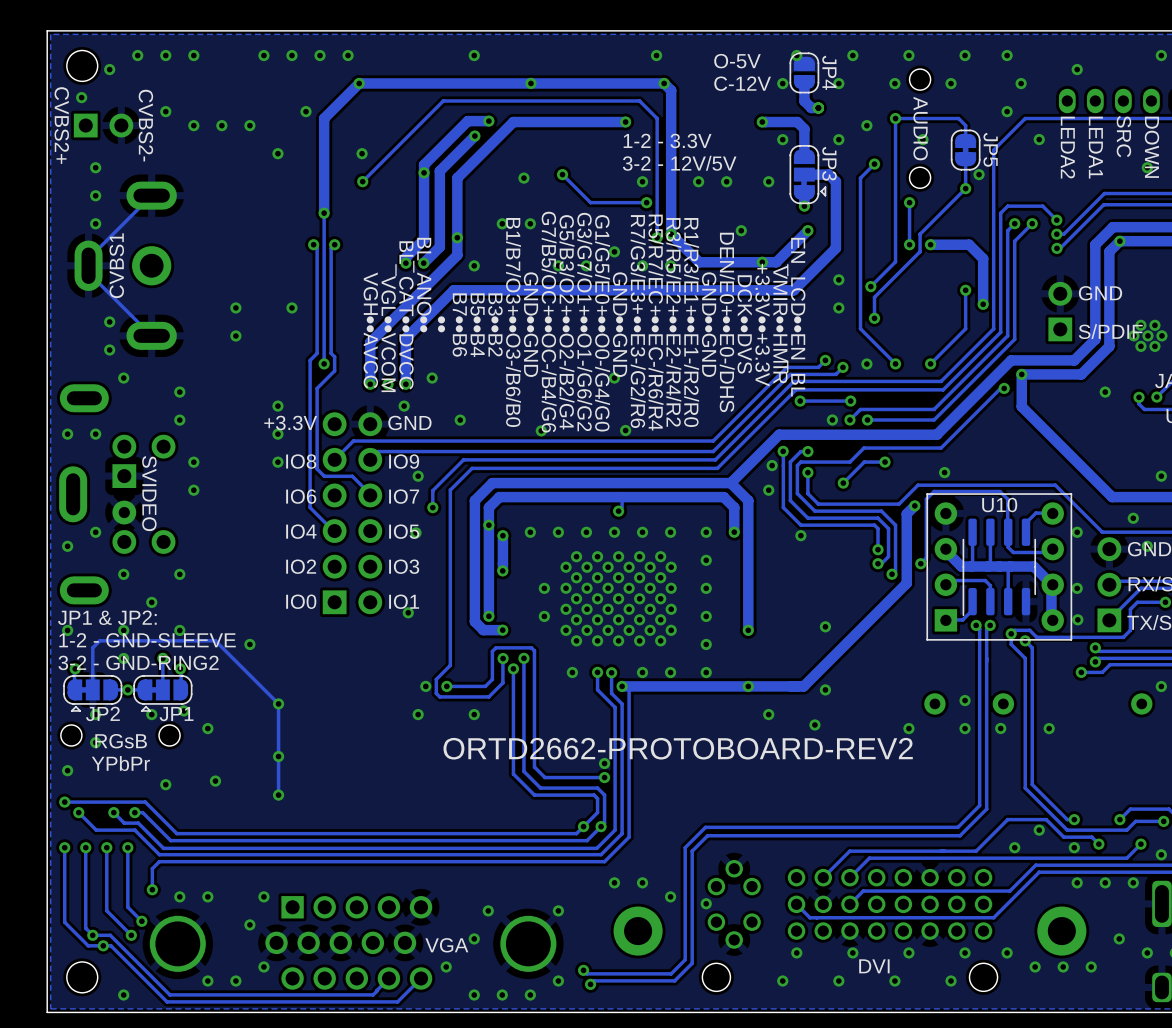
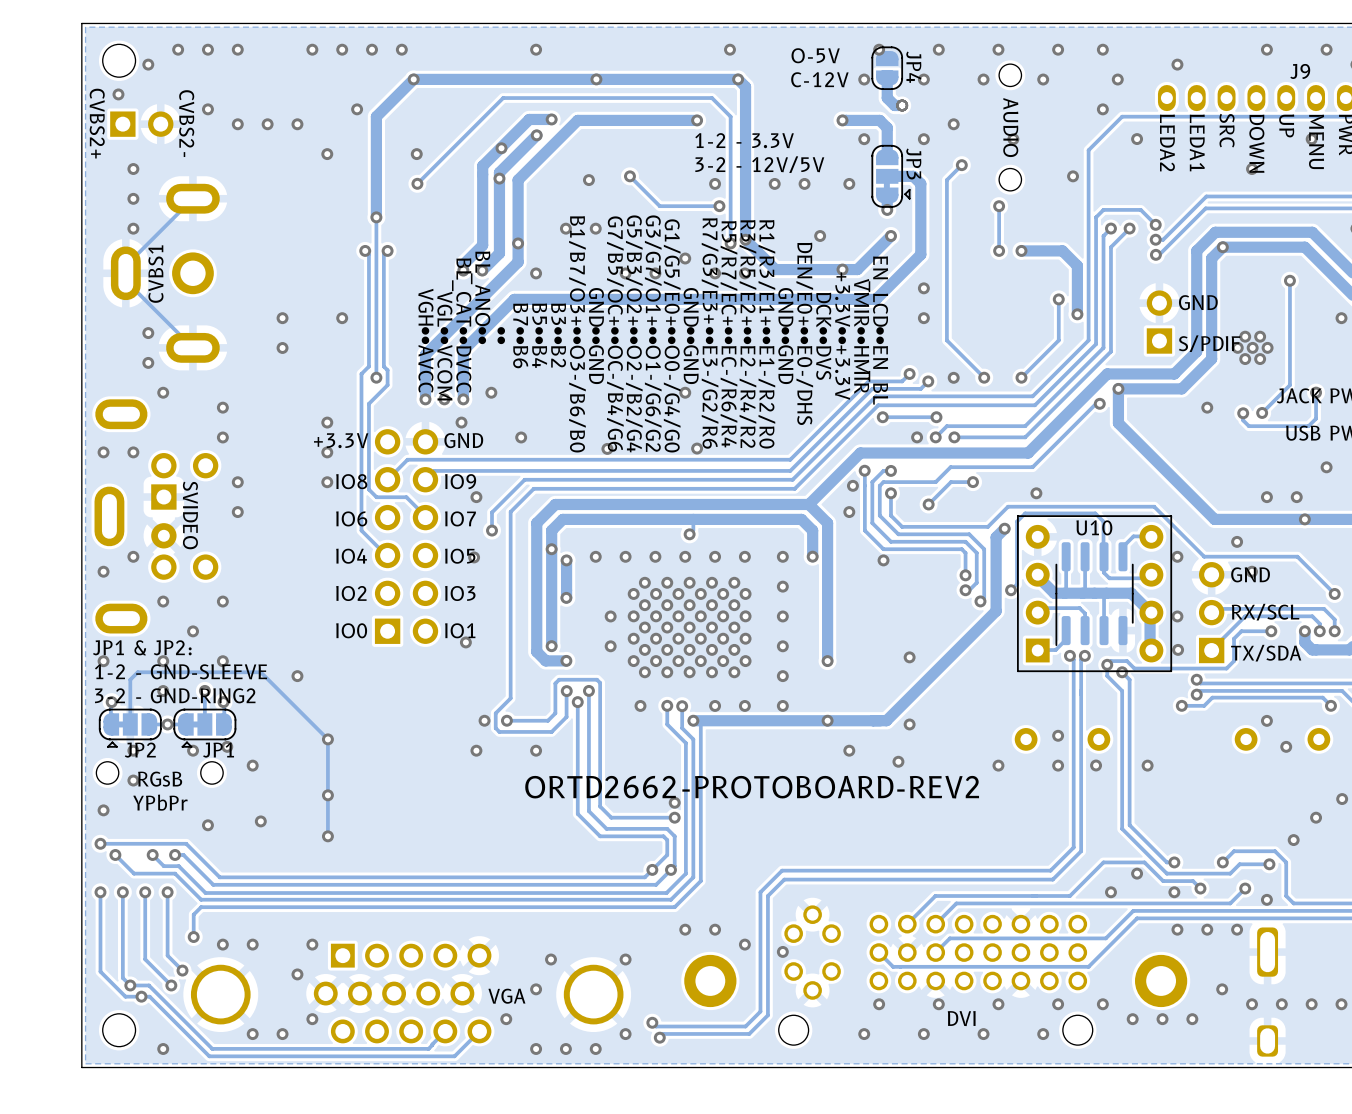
via: (895, 118) -> none
track: (965, 140) (965, 125) (958, 118) (895, 118) (895, 261) (870, 286) -> none
via: none -> (501, 148)
JP5: (965, 150) -> none
track: (965, 160) (965, 188) (920, 234) (920, 251) (874, 297) (874, 318) -> none
via: (424, 172) -> none
via: none -> (499, 178)
via: (965, 188) -> none
via: (870, 286) -> none
via: (874, 318) -> none

